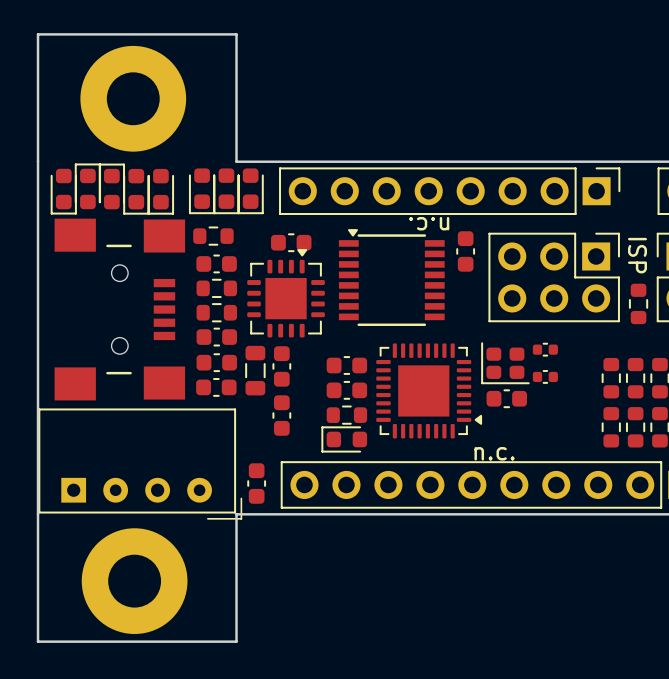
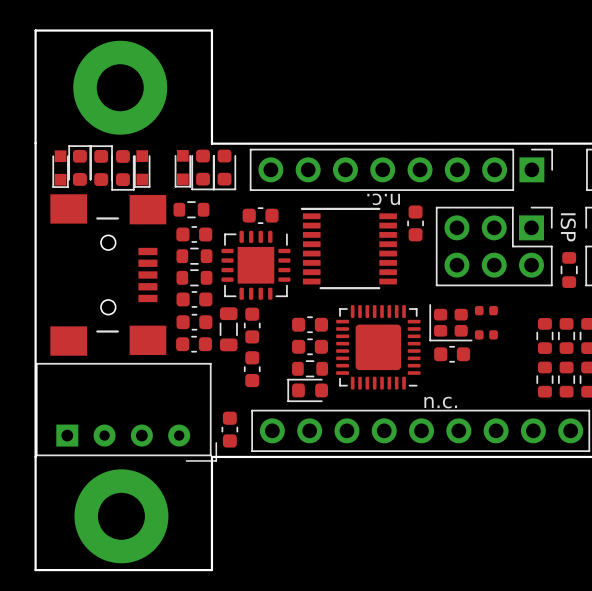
part footprint: [50, 168, 77, 215] -> [52, 150, 69, 188]
part footprint: [147, 168, 175, 215] -> [134, 150, 151, 188]
part footprint: [188, 168, 216, 215] -> [174, 149, 192, 188]
part footprint: [338, 229, 445, 327] -> [300, 207, 397, 290]
part footprint: [247, 249, 325, 338] -> [221, 230, 291, 300]
part footprint: [532, 342, 558, 357] -> [474, 305, 498, 316]
part footprint: [376, 343, 483, 439] -> [336, 305, 421, 390]
part footprint: [532, 369, 558, 384] -> [474, 330, 498, 340]

